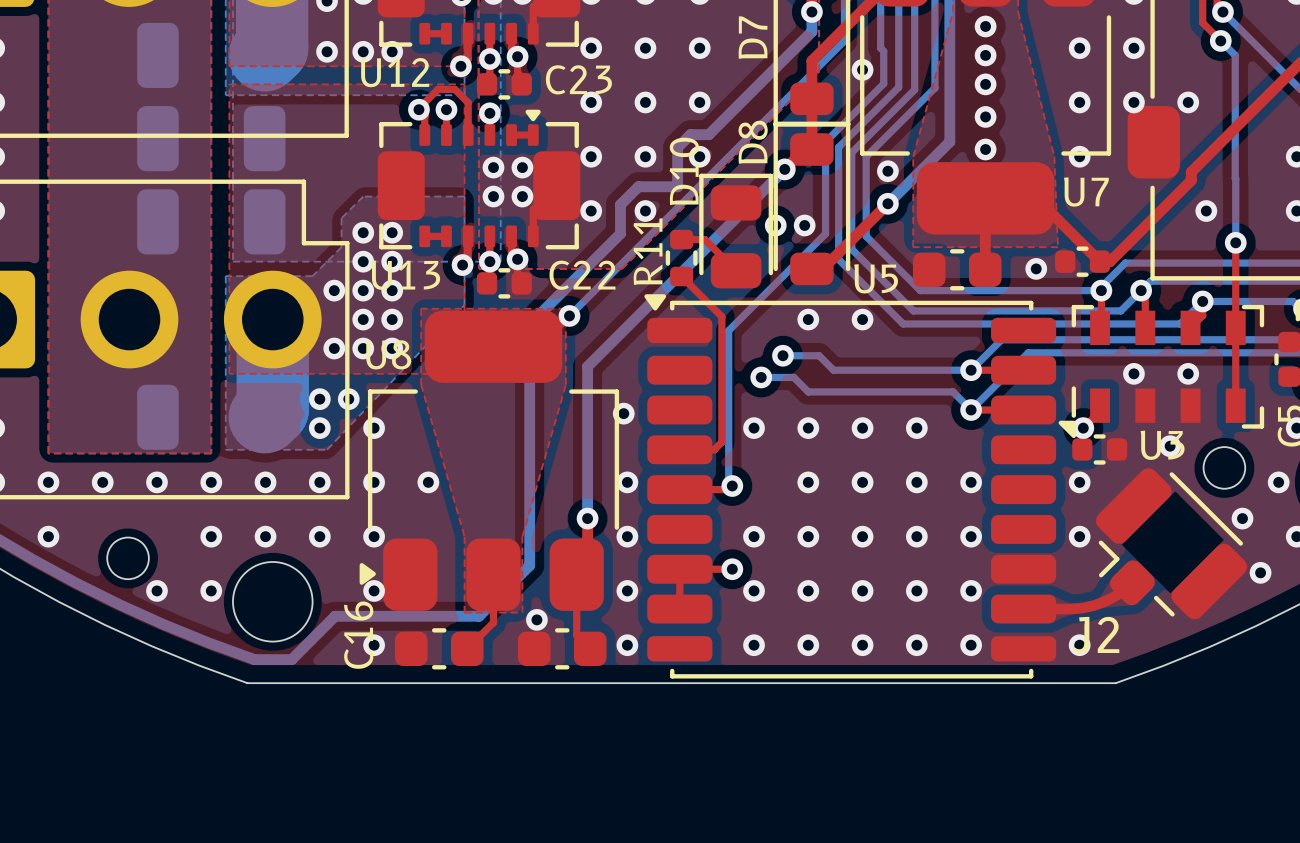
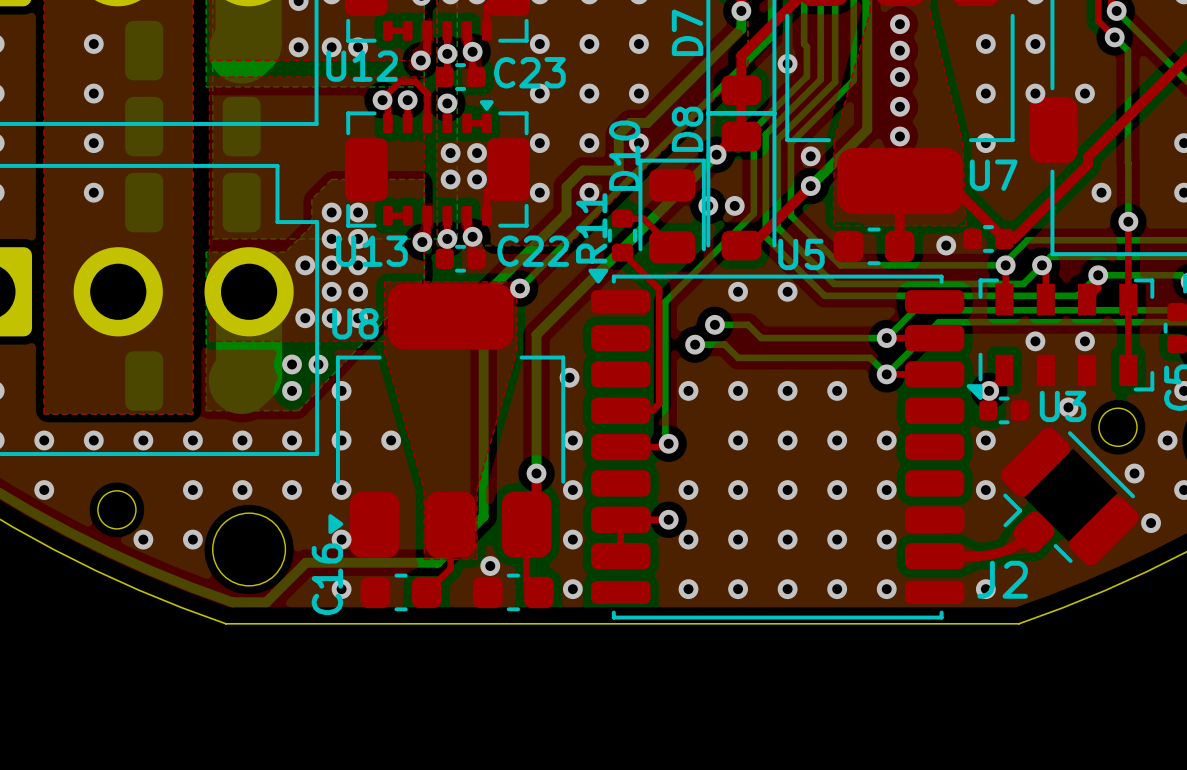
via: none -> (93, 44)
via: none -> (93, 93)
via: none -> (93, 143)
via: none -> (93, 192)

